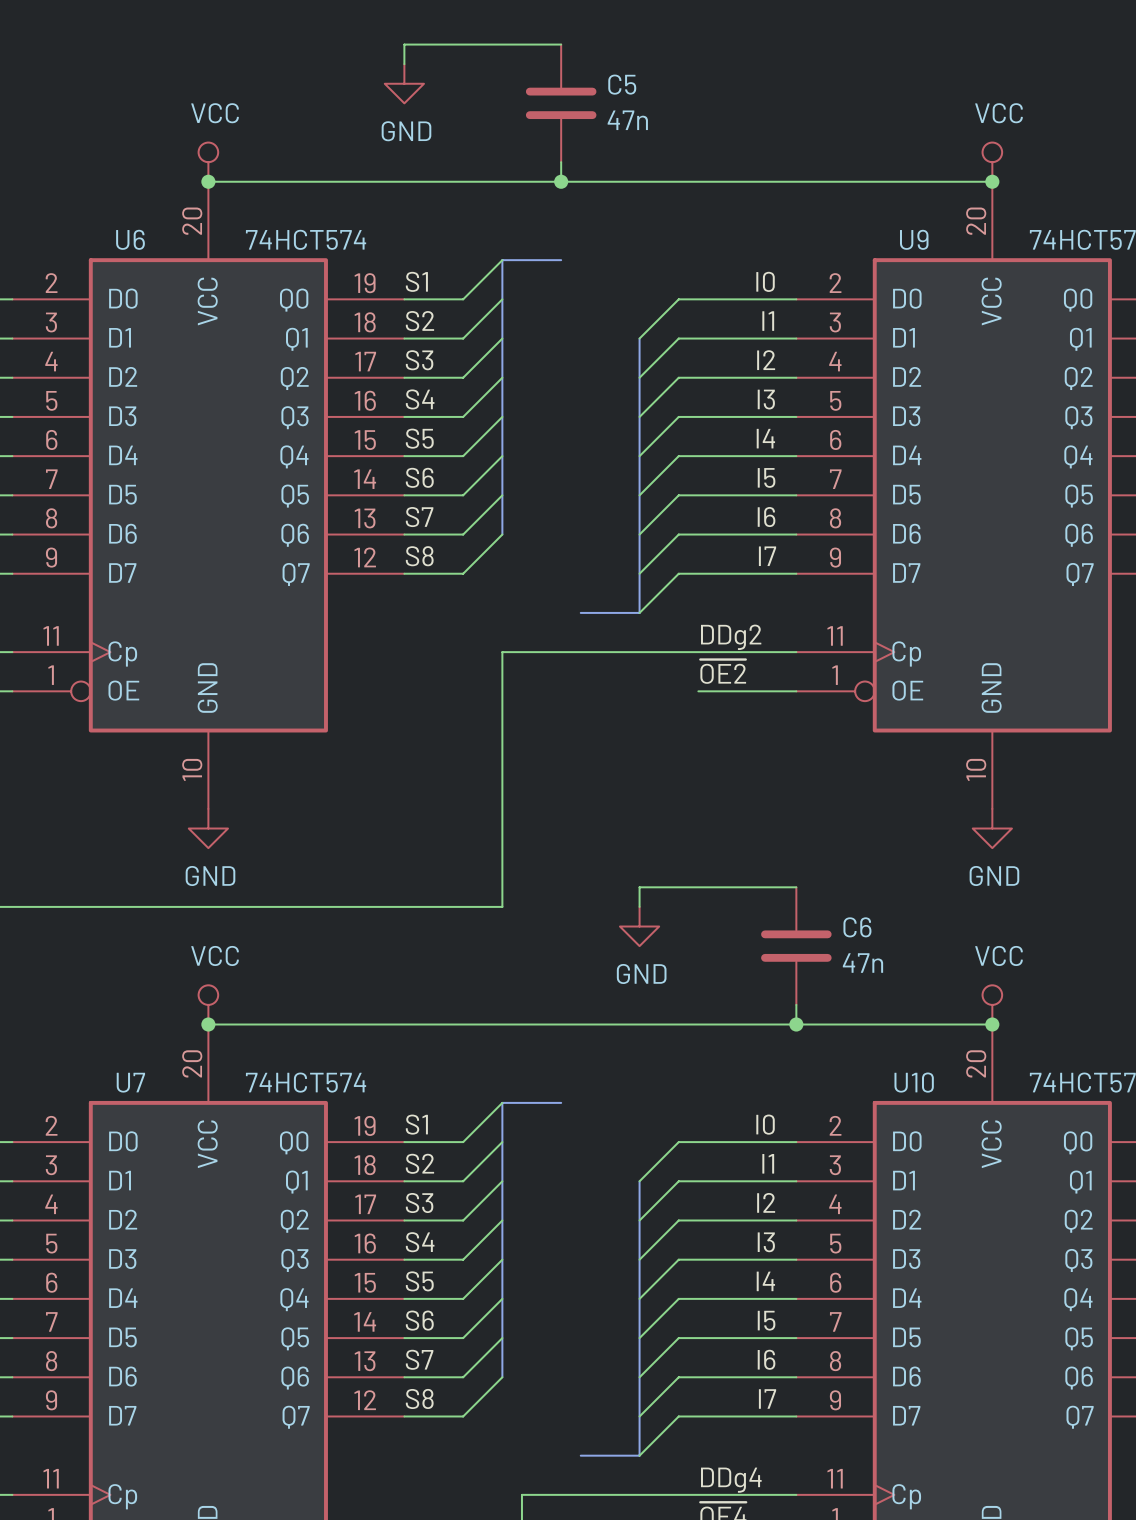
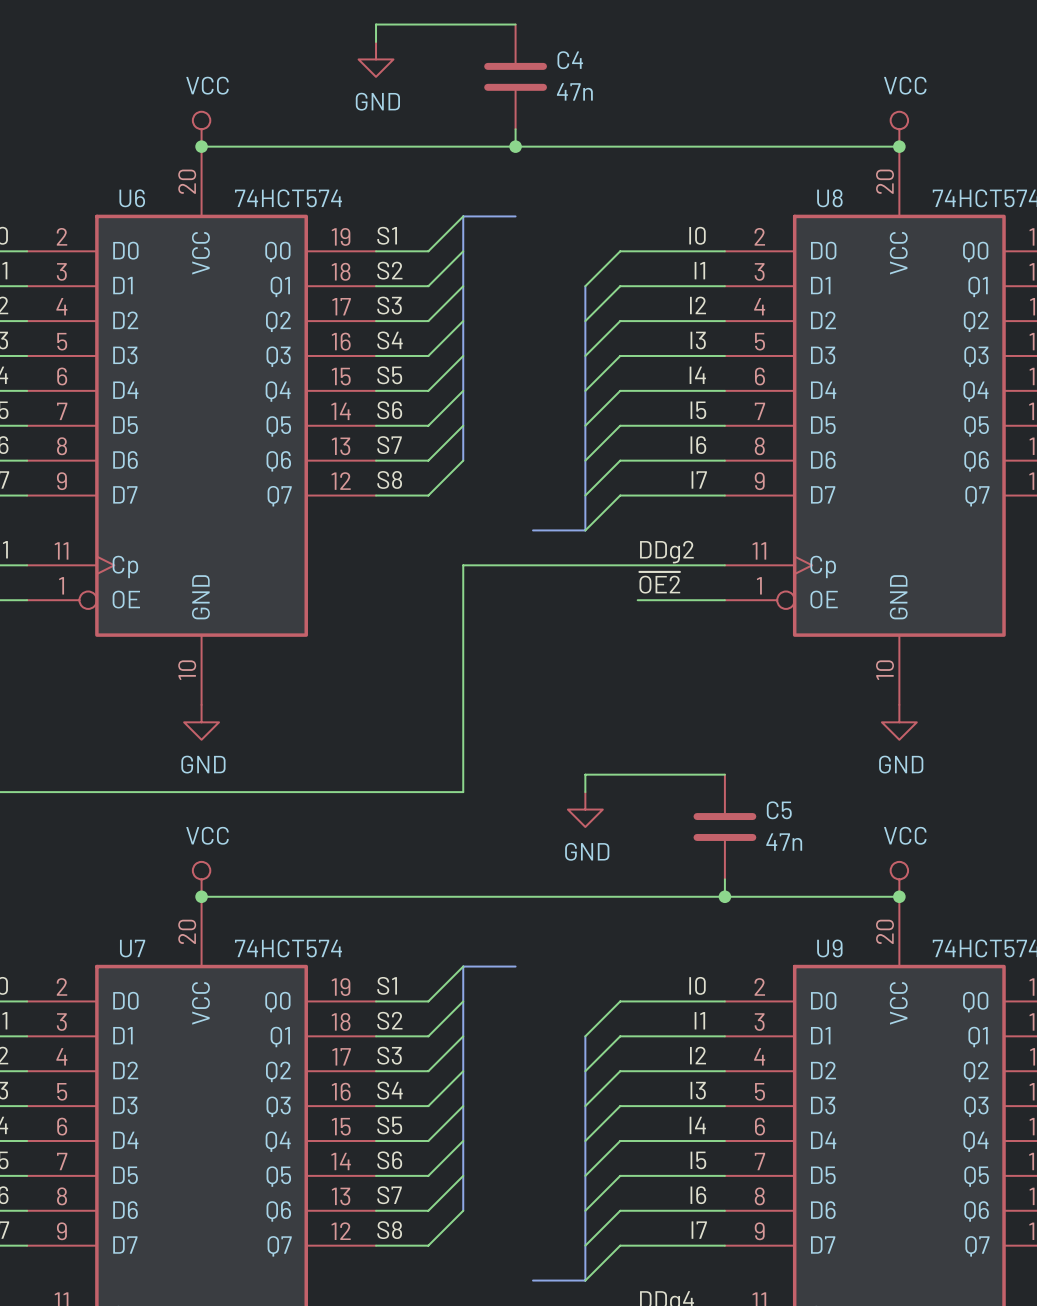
C5 name: C5 (622, 84) -> C4 (570, 60)
U9 name: U9 (914, 239) -> U8 (829, 198)
C6 name: C6 (857, 927) -> C5 (779, 810)
U10 name: U10 (914, 1082) -> U9 (829, 948)

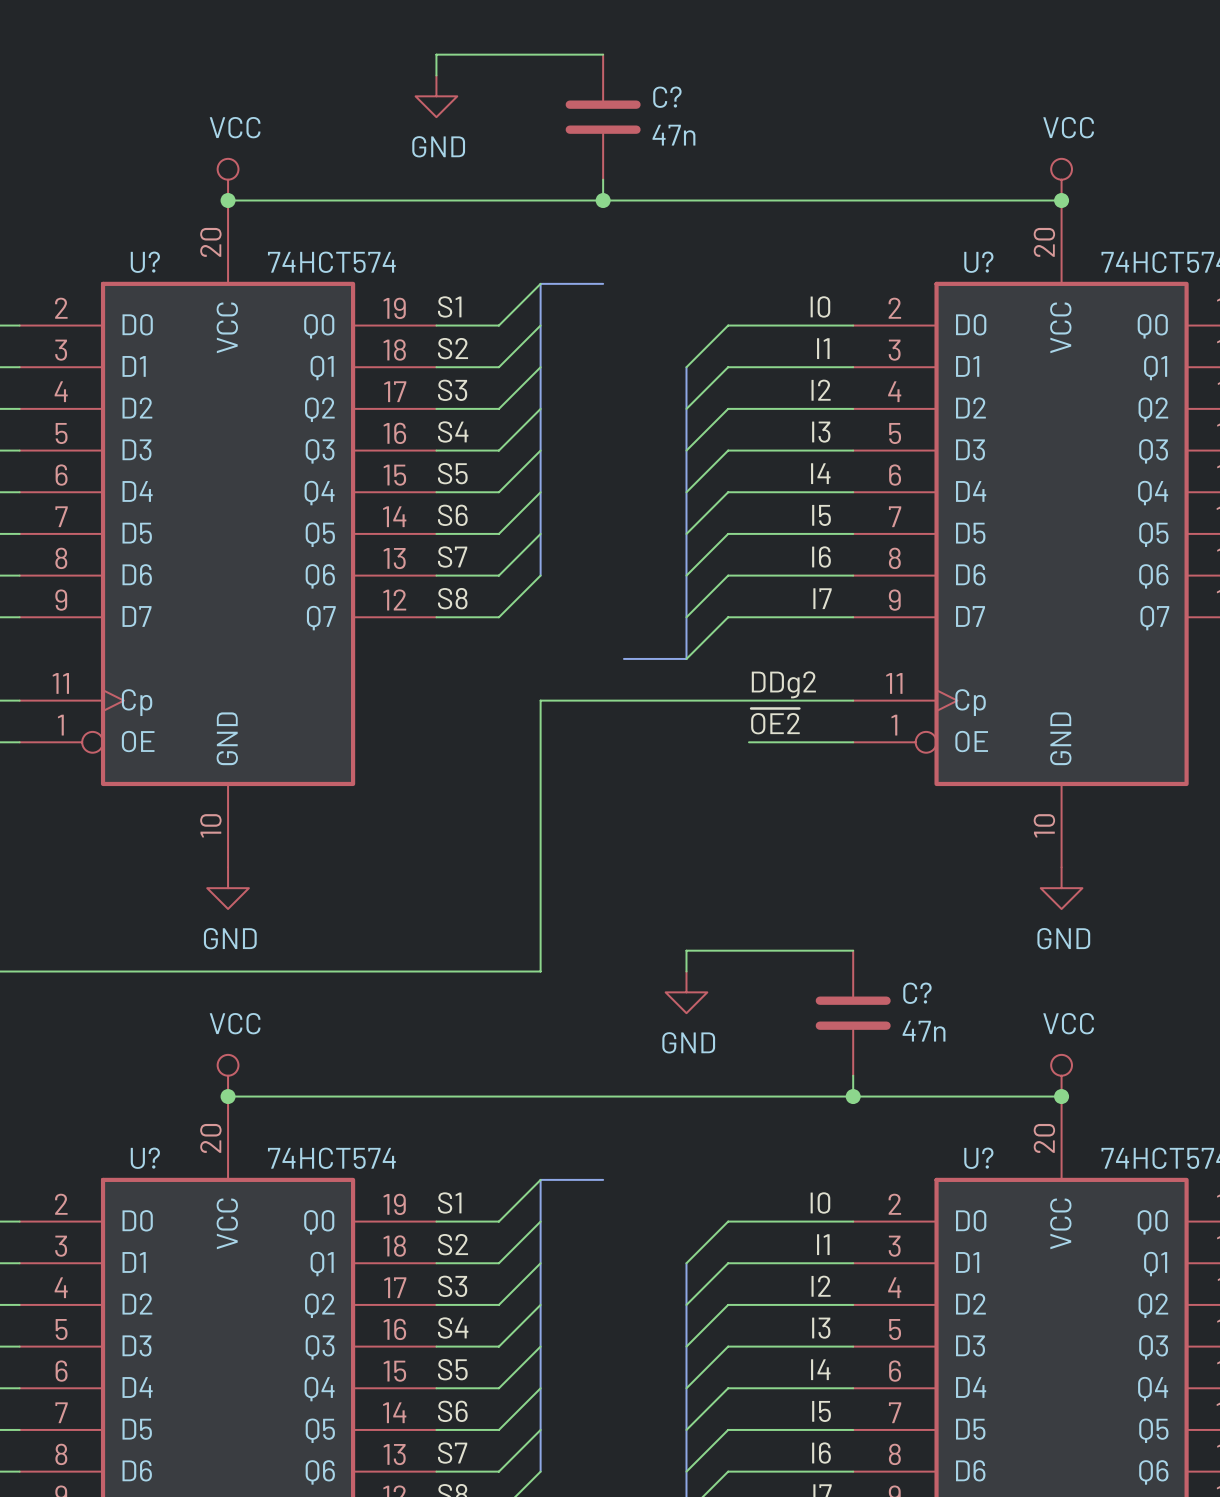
C4 name: C4 (570, 60) -> C? (667, 97)
U6 name: U6 (132, 198) -> U? (145, 262)
U8 name: U8 (829, 198) -> U? (978, 262)
C5 name: C5 (779, 810) -> C? (917, 993)
U7 name: U7 (132, 948) -> U? (145, 1158)
U9 name: U9 (829, 948) -> U? (978, 1158)

